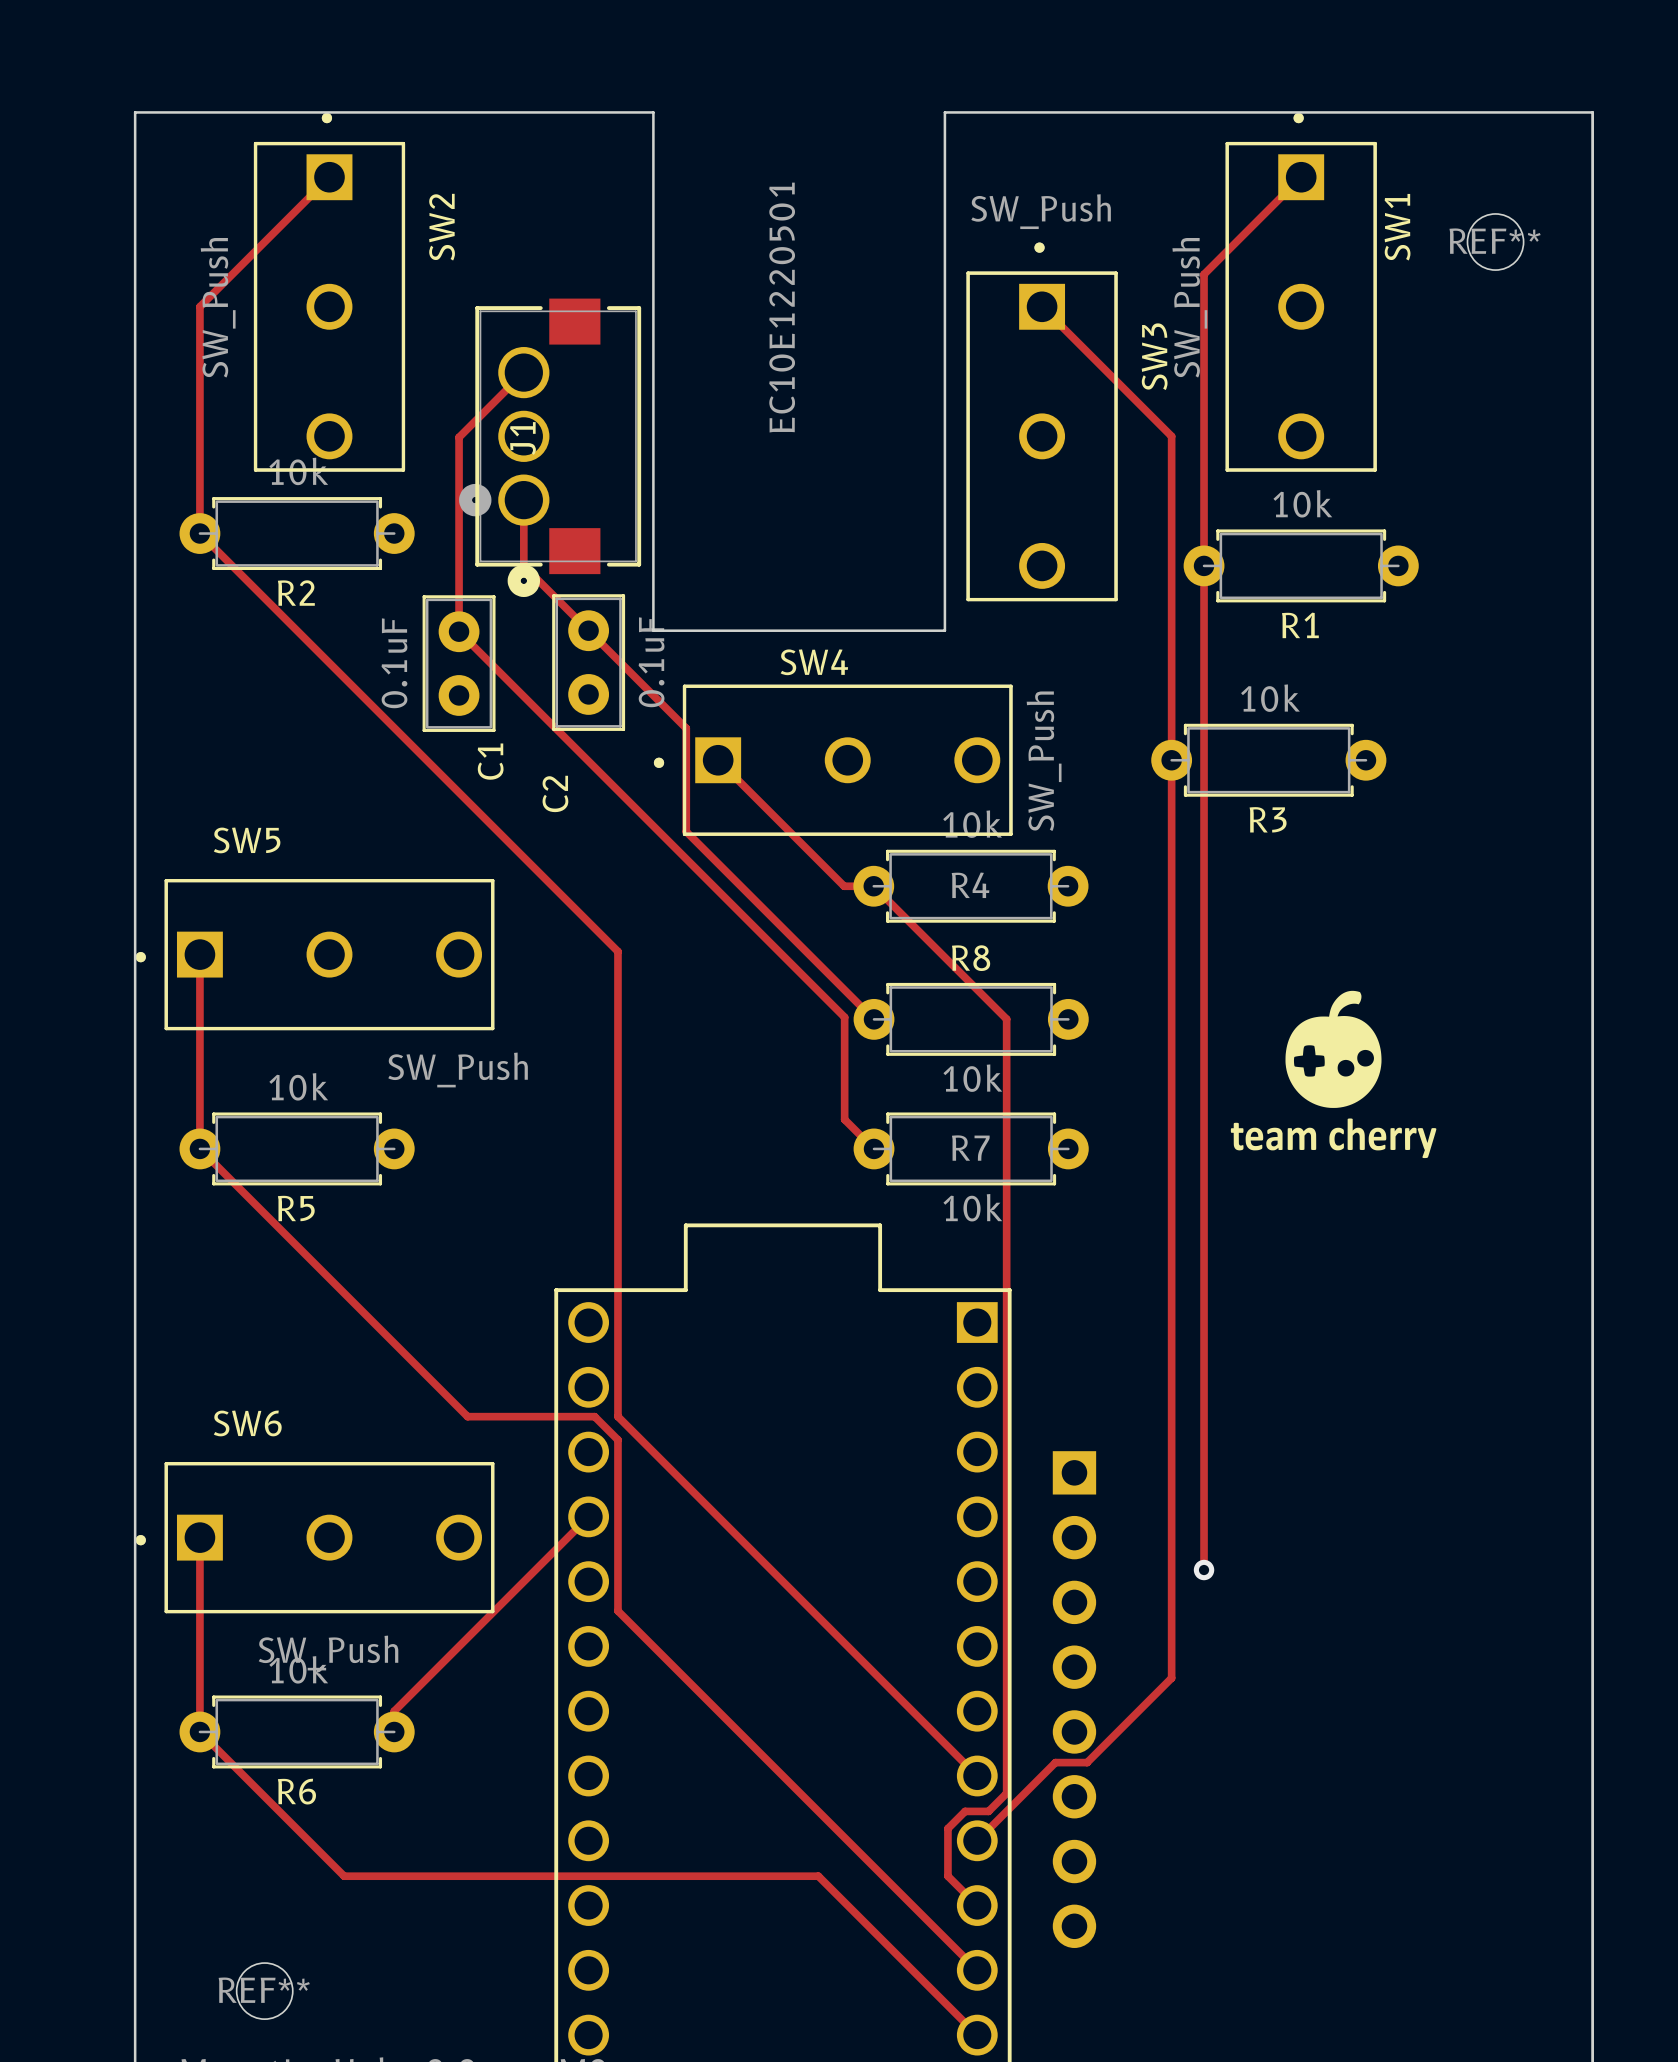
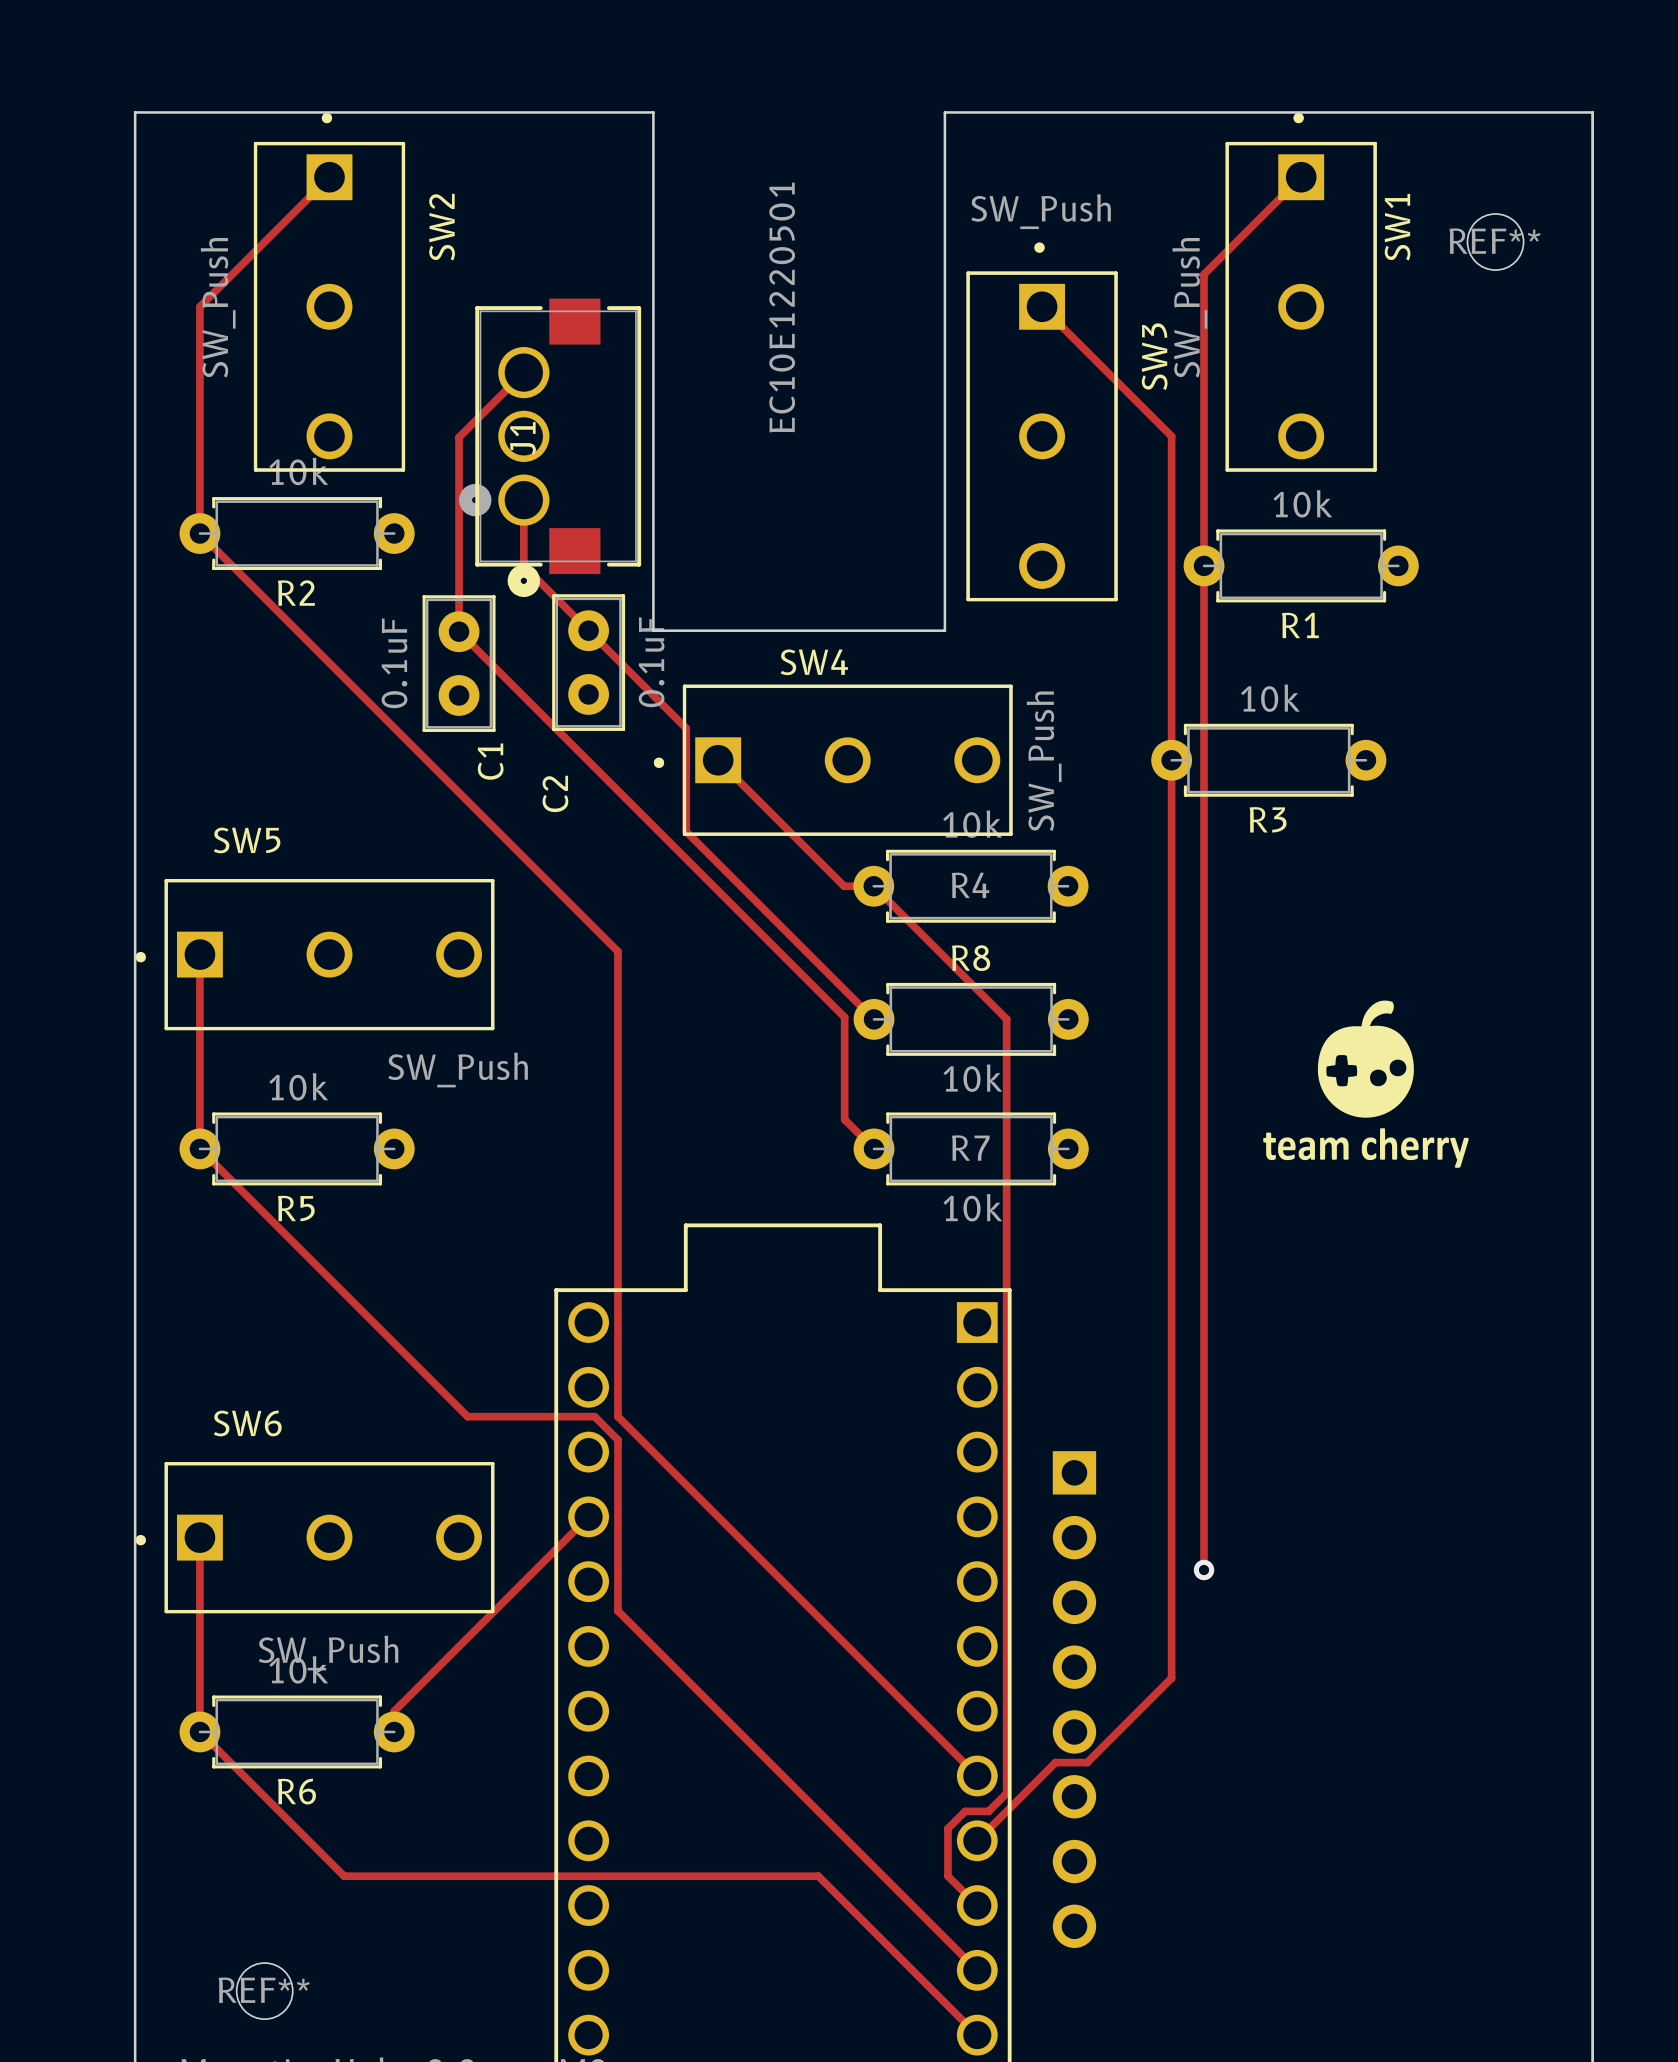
drawing position: (1333, 1074) -> (1365, 1084)

